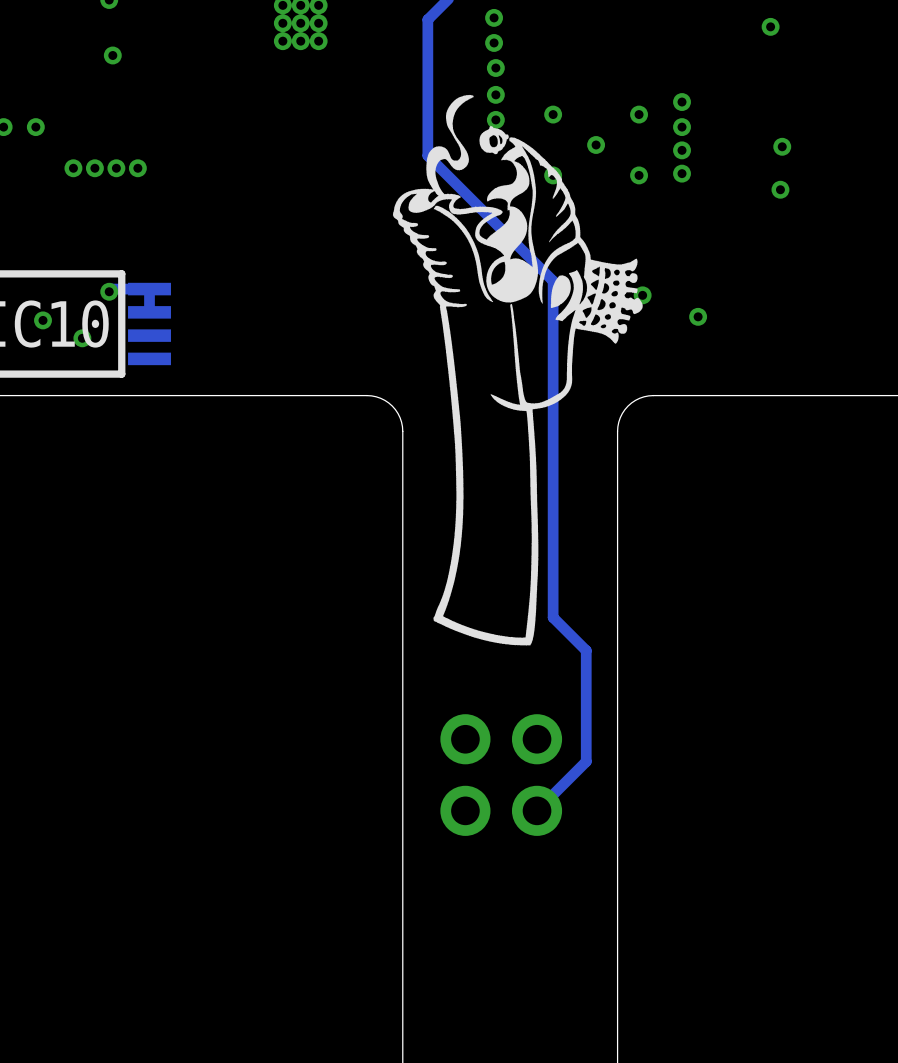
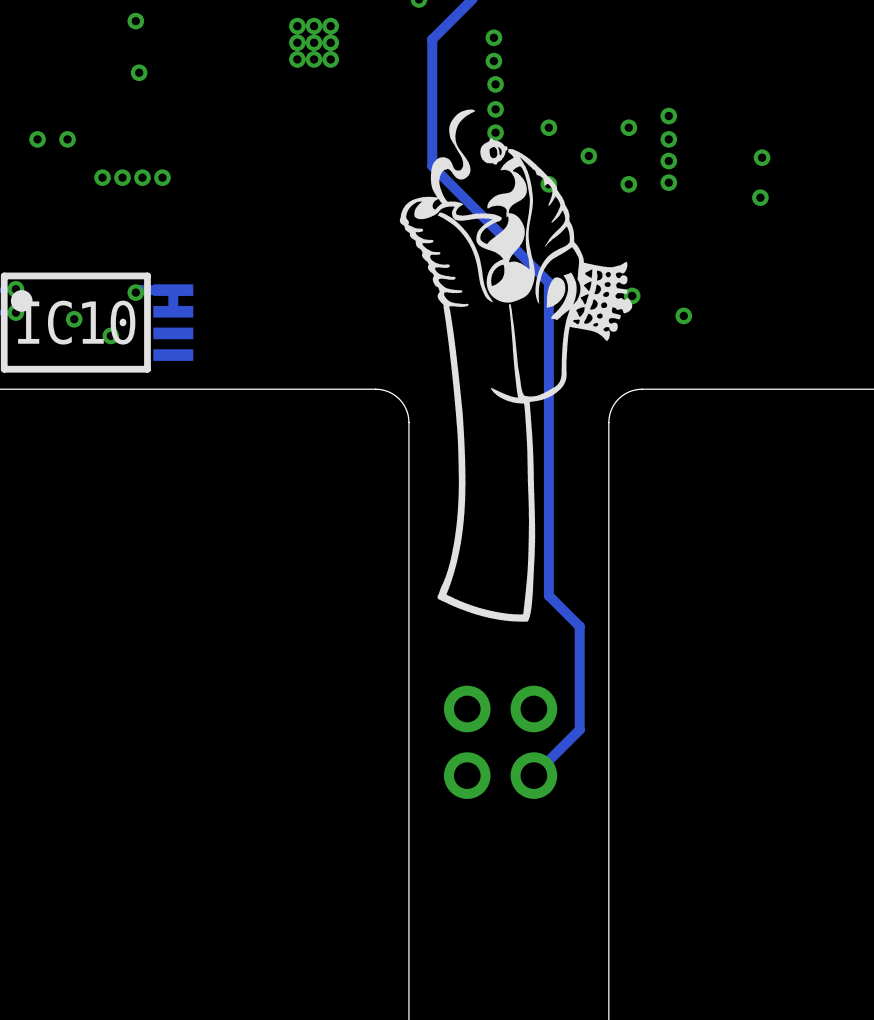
via: (770, 26) -> none

